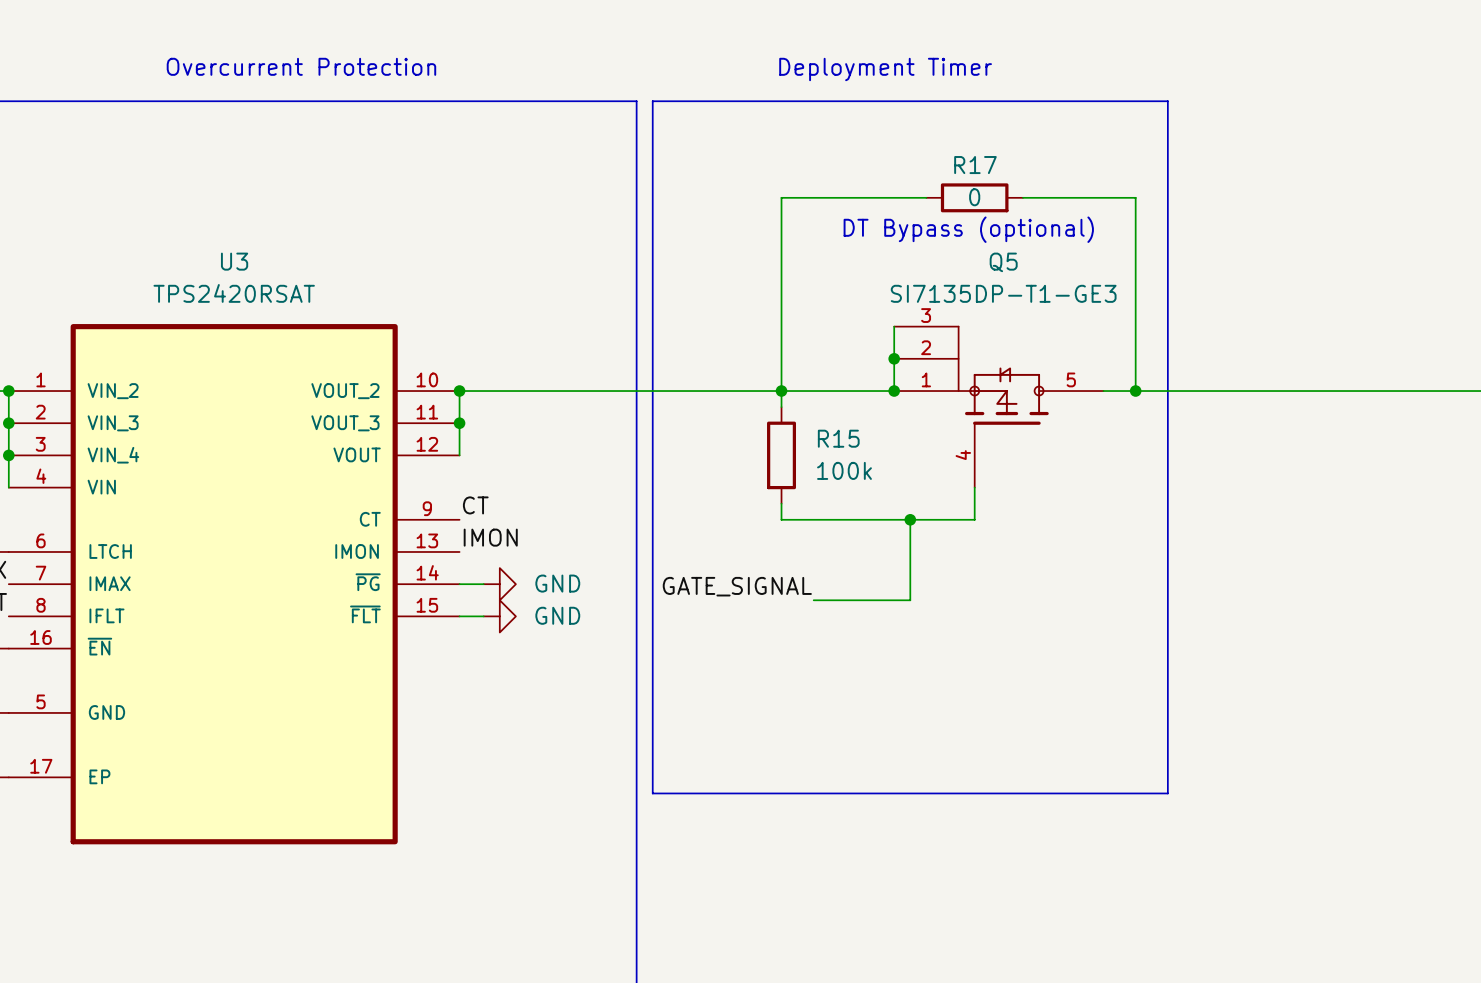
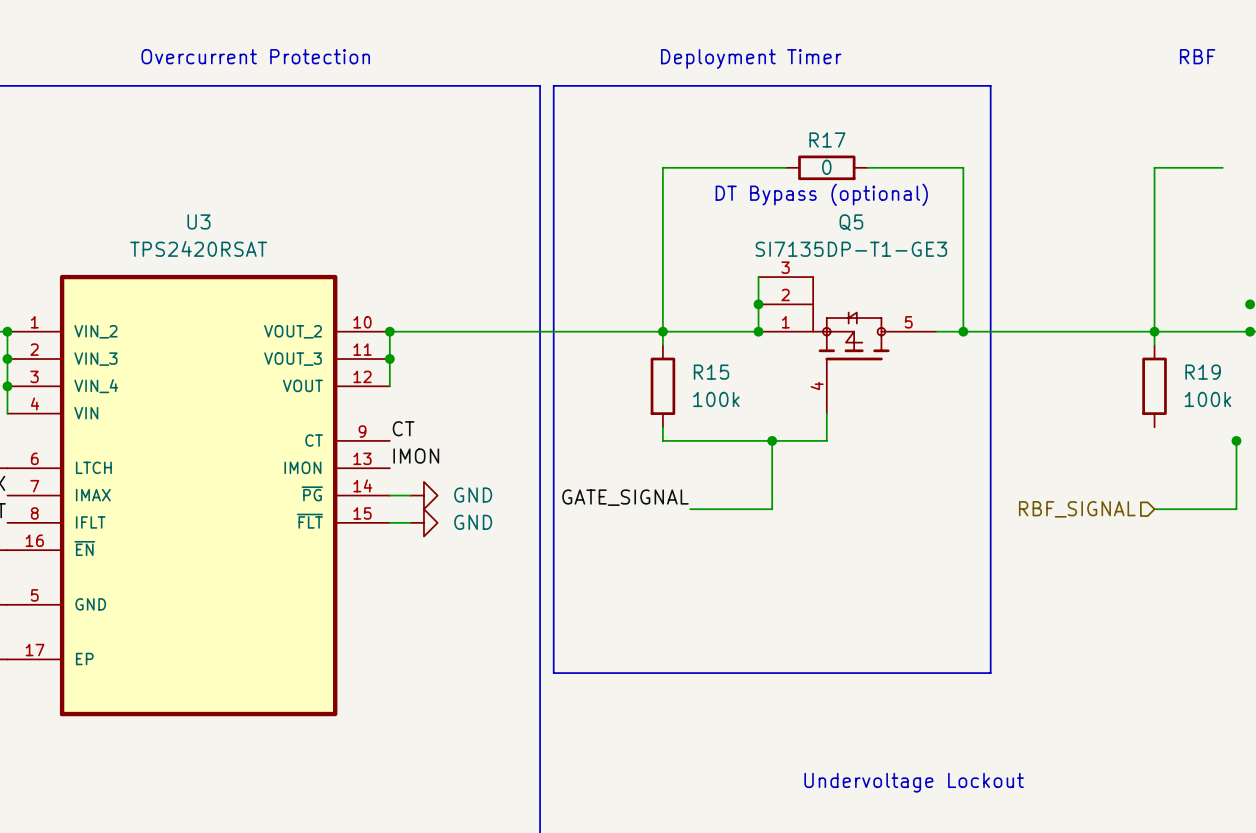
text: none -> RBF (1197, 56)
wire: none -> (1222, 167) (1154, 167) (1154, 345)
junction: none -> (1250, 304)
junction: none -> (1154, 331)
junction: none -> (1250, 331)
R19: none -> 100k (1154, 386)
wire: none -> (1236, 440) (1236, 509) (1154, 509)
junction: none -> (1236, 440)
hierarchical label: none -> RBF_SIGNAL (1077, 509)
text: none -> Undervoltage Lockout (914, 782)

